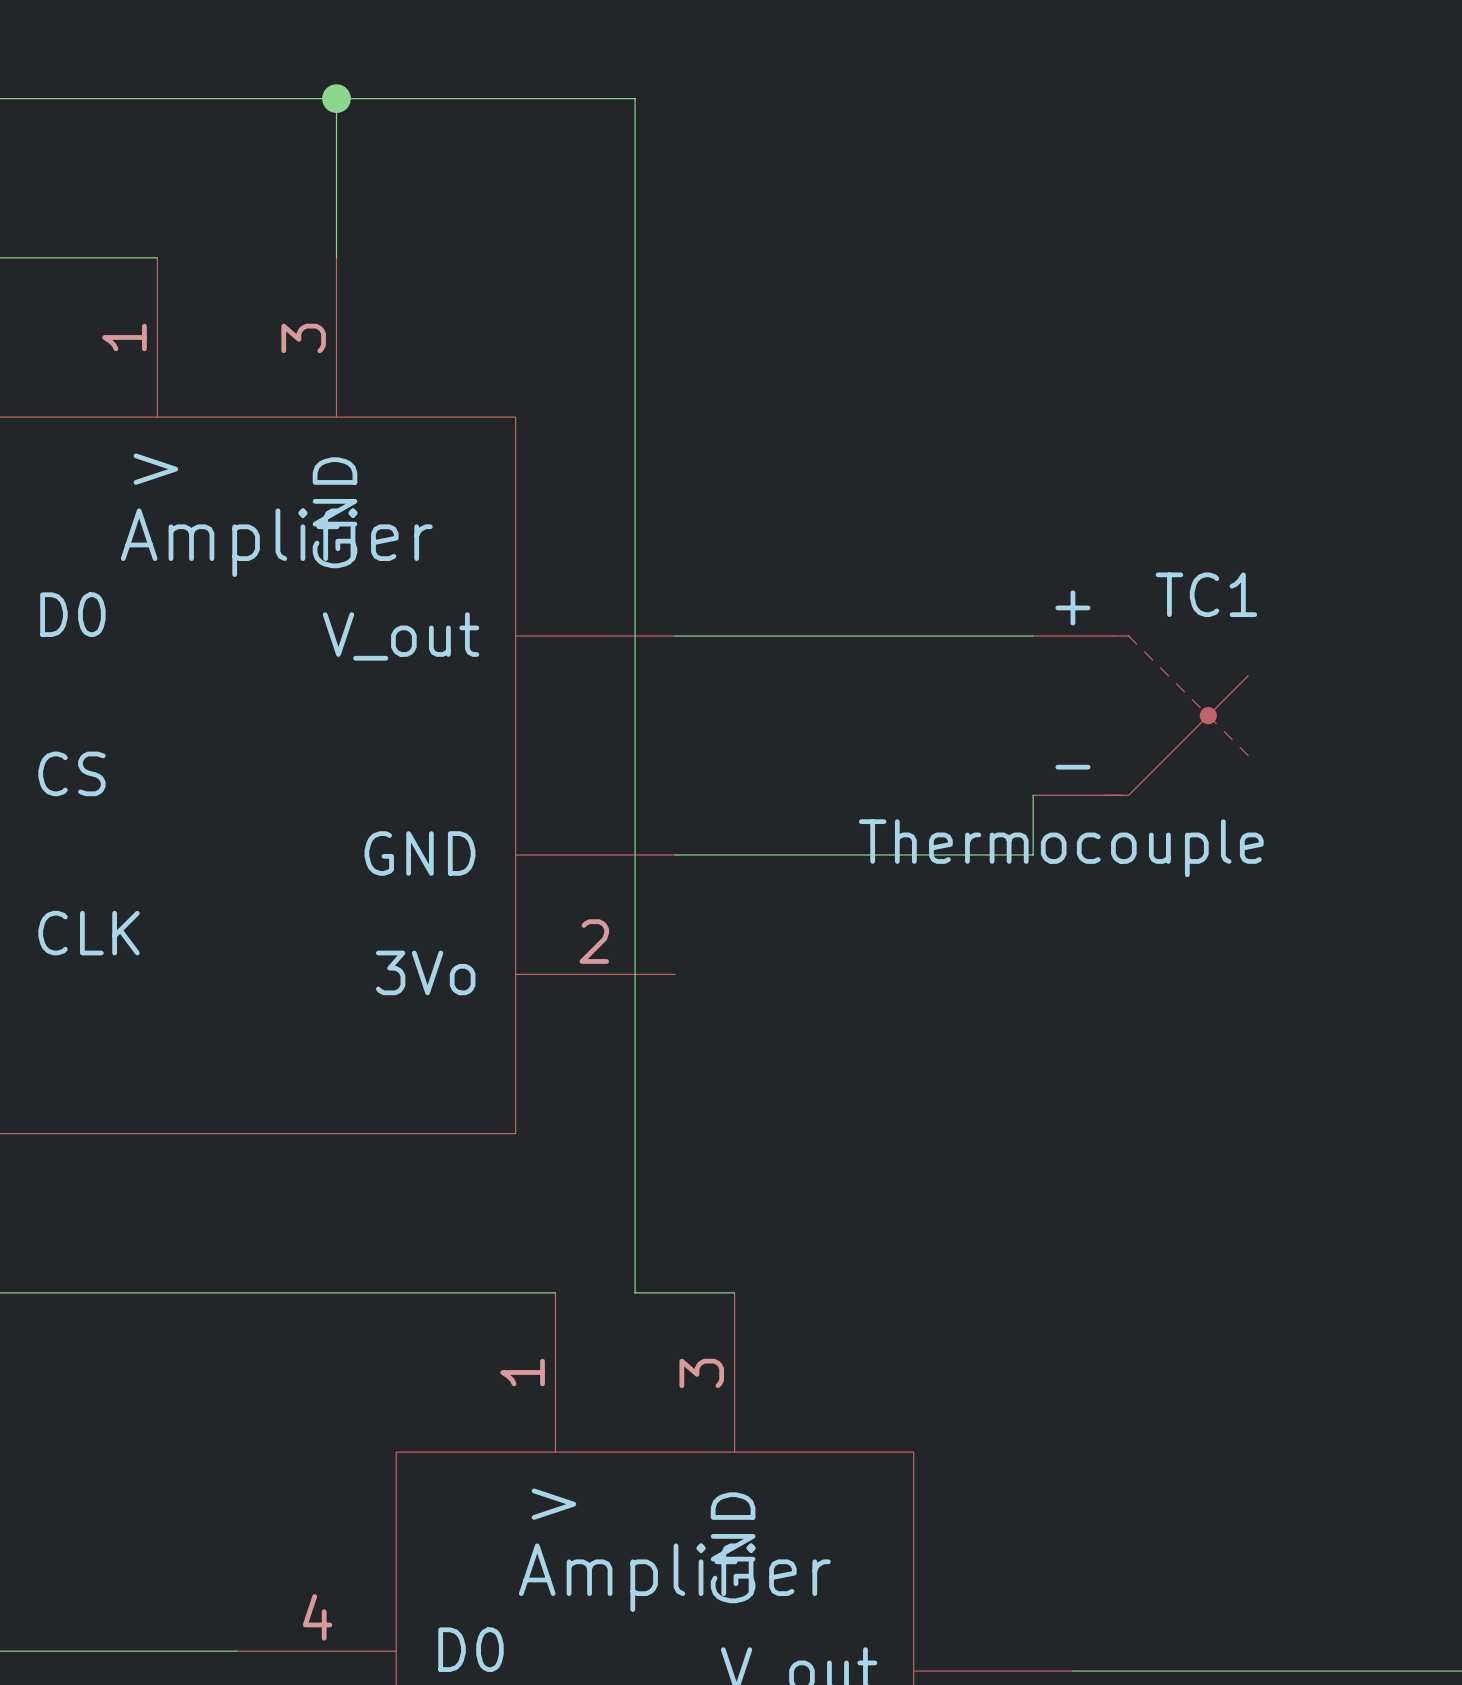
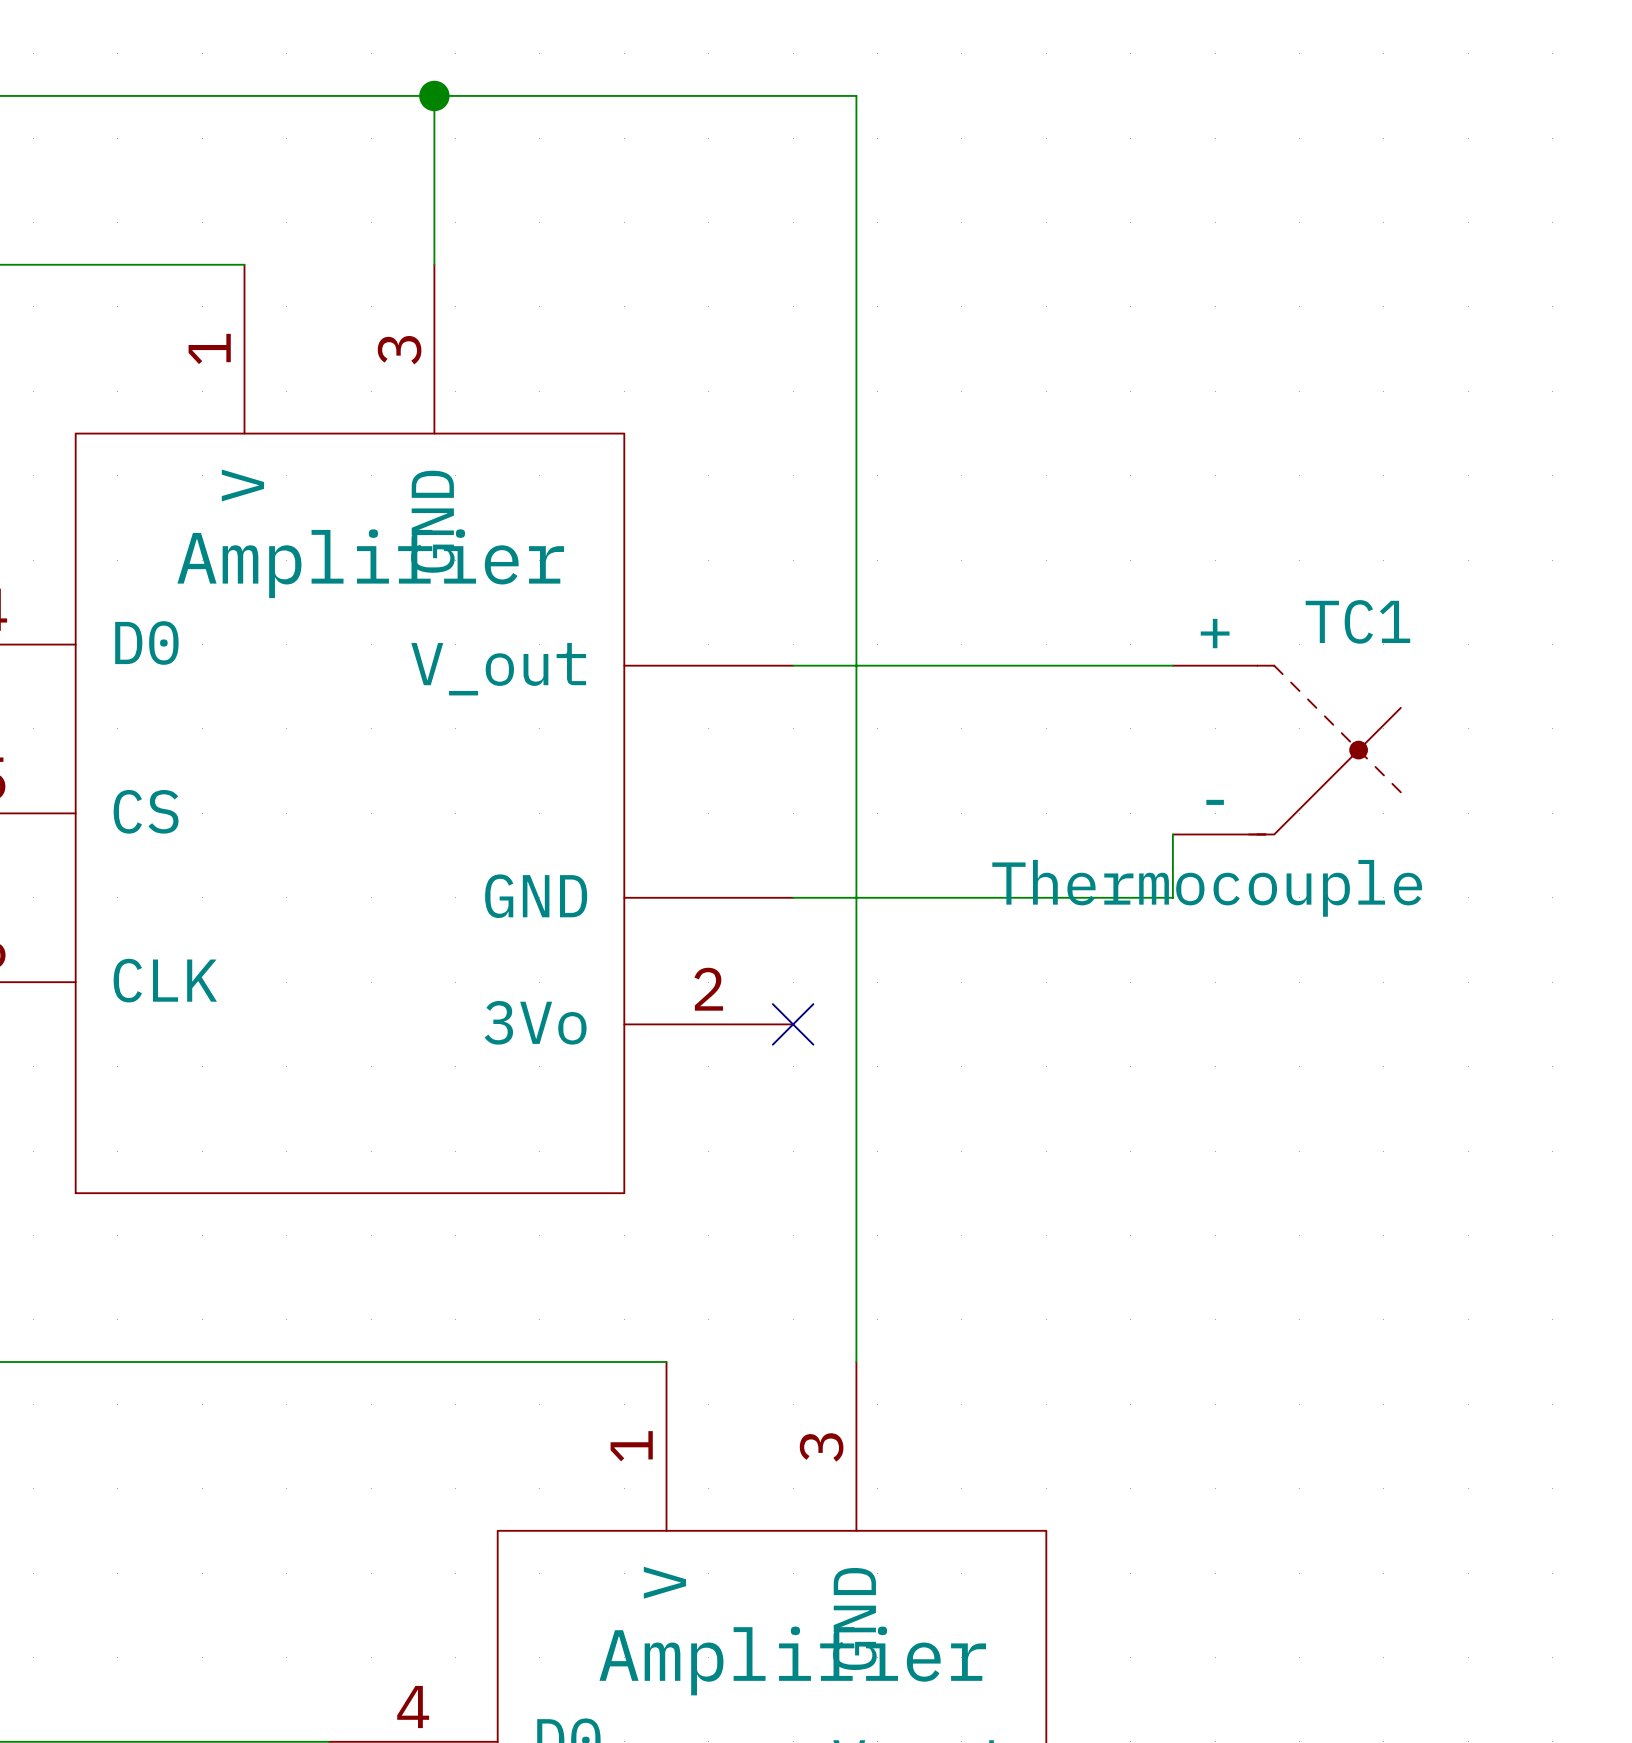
wire: (635, 98) (635, 1292) (734, 1292) -> (750, 95) (856, 95) (856, 1362)
no-connect mark: none -> (793, 1024)

